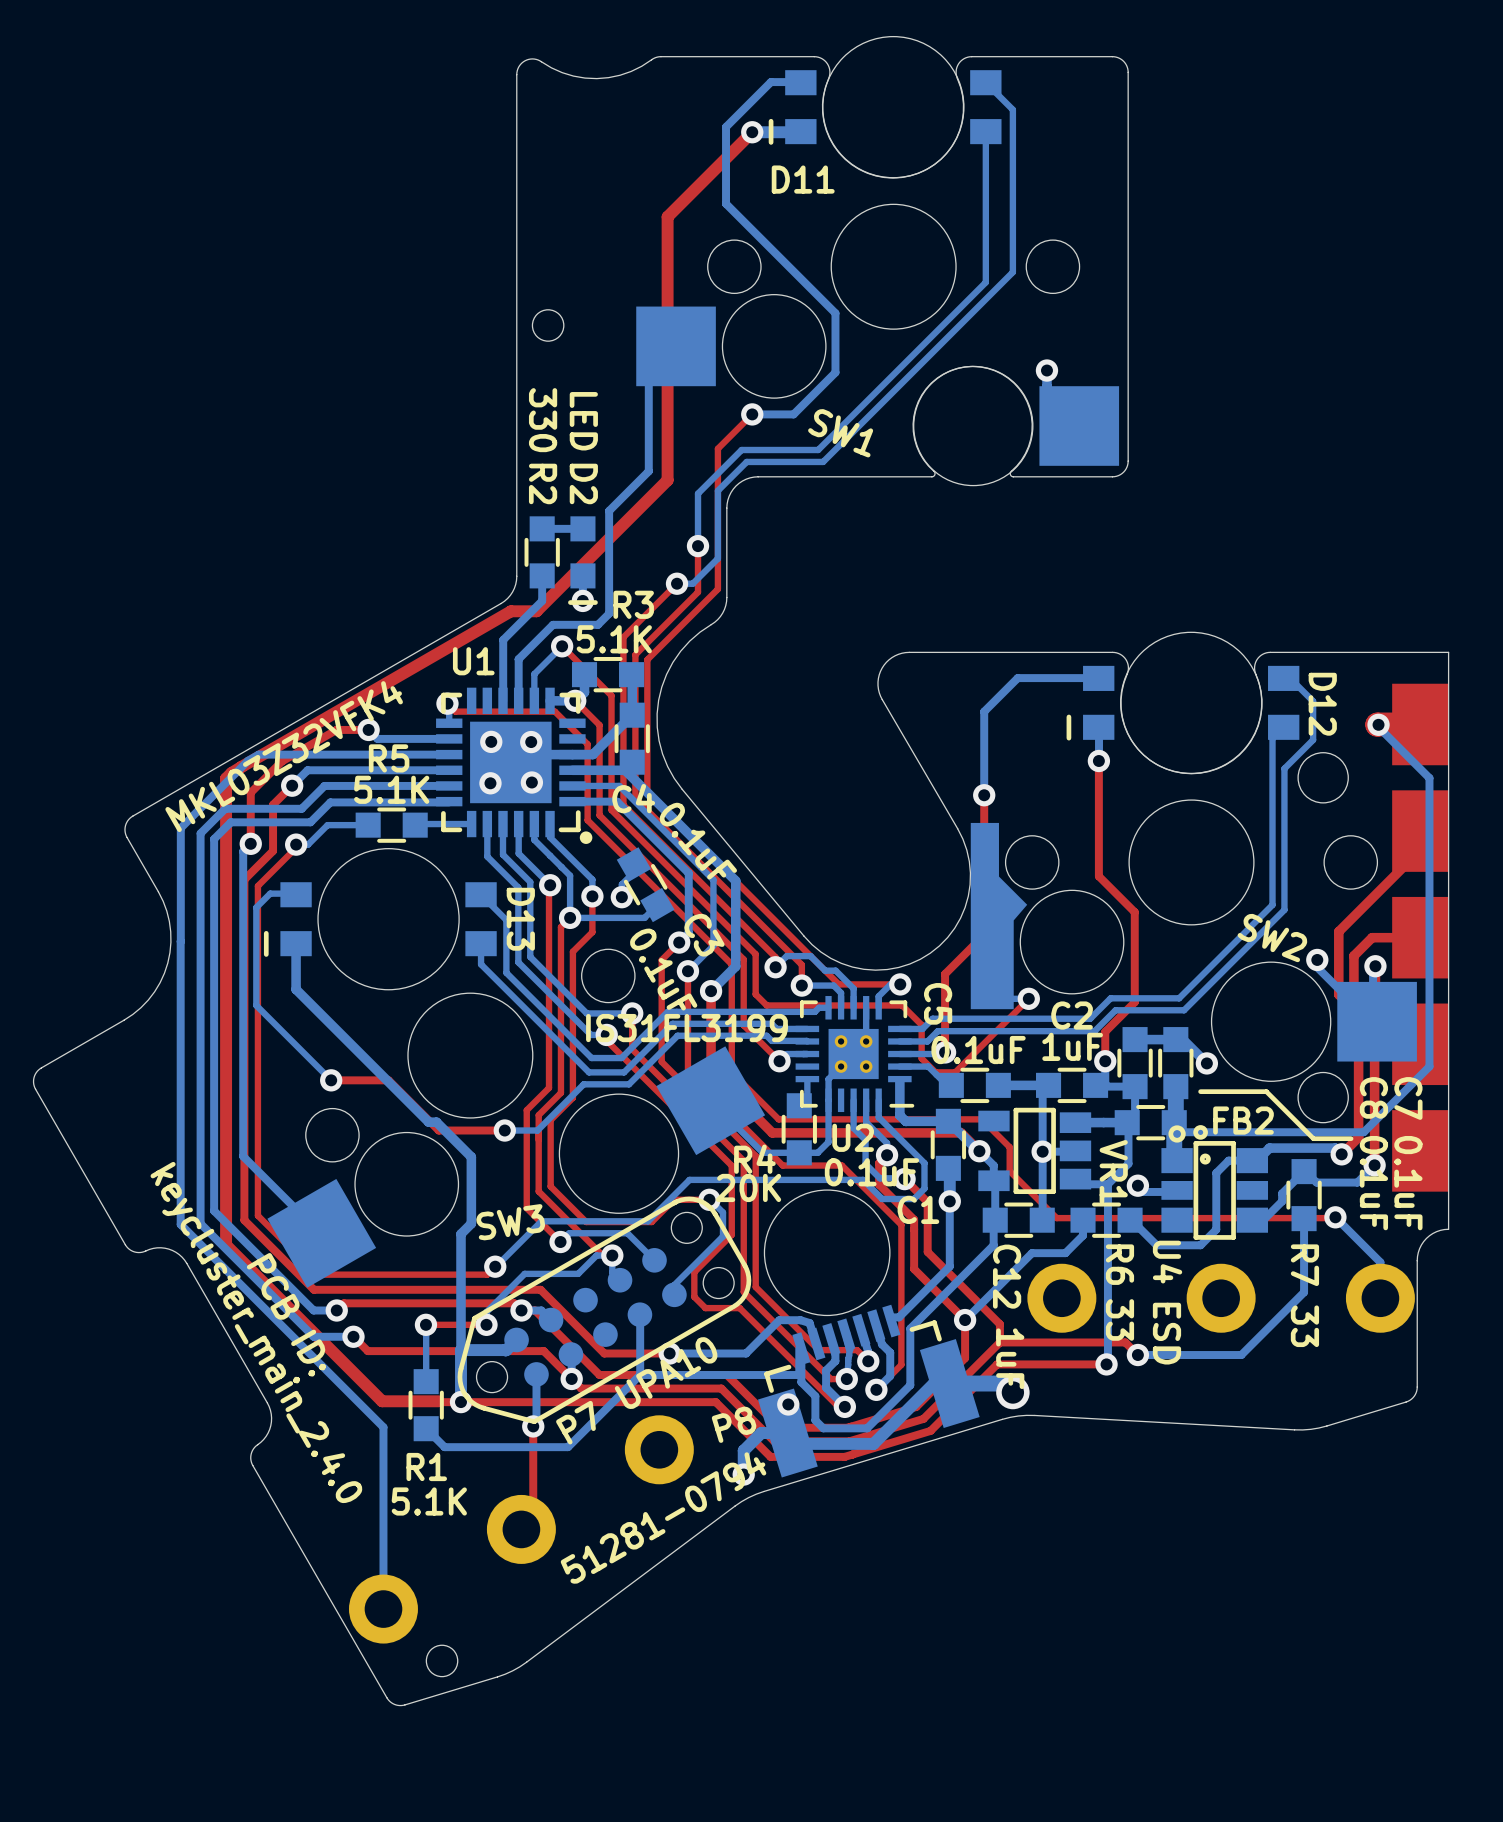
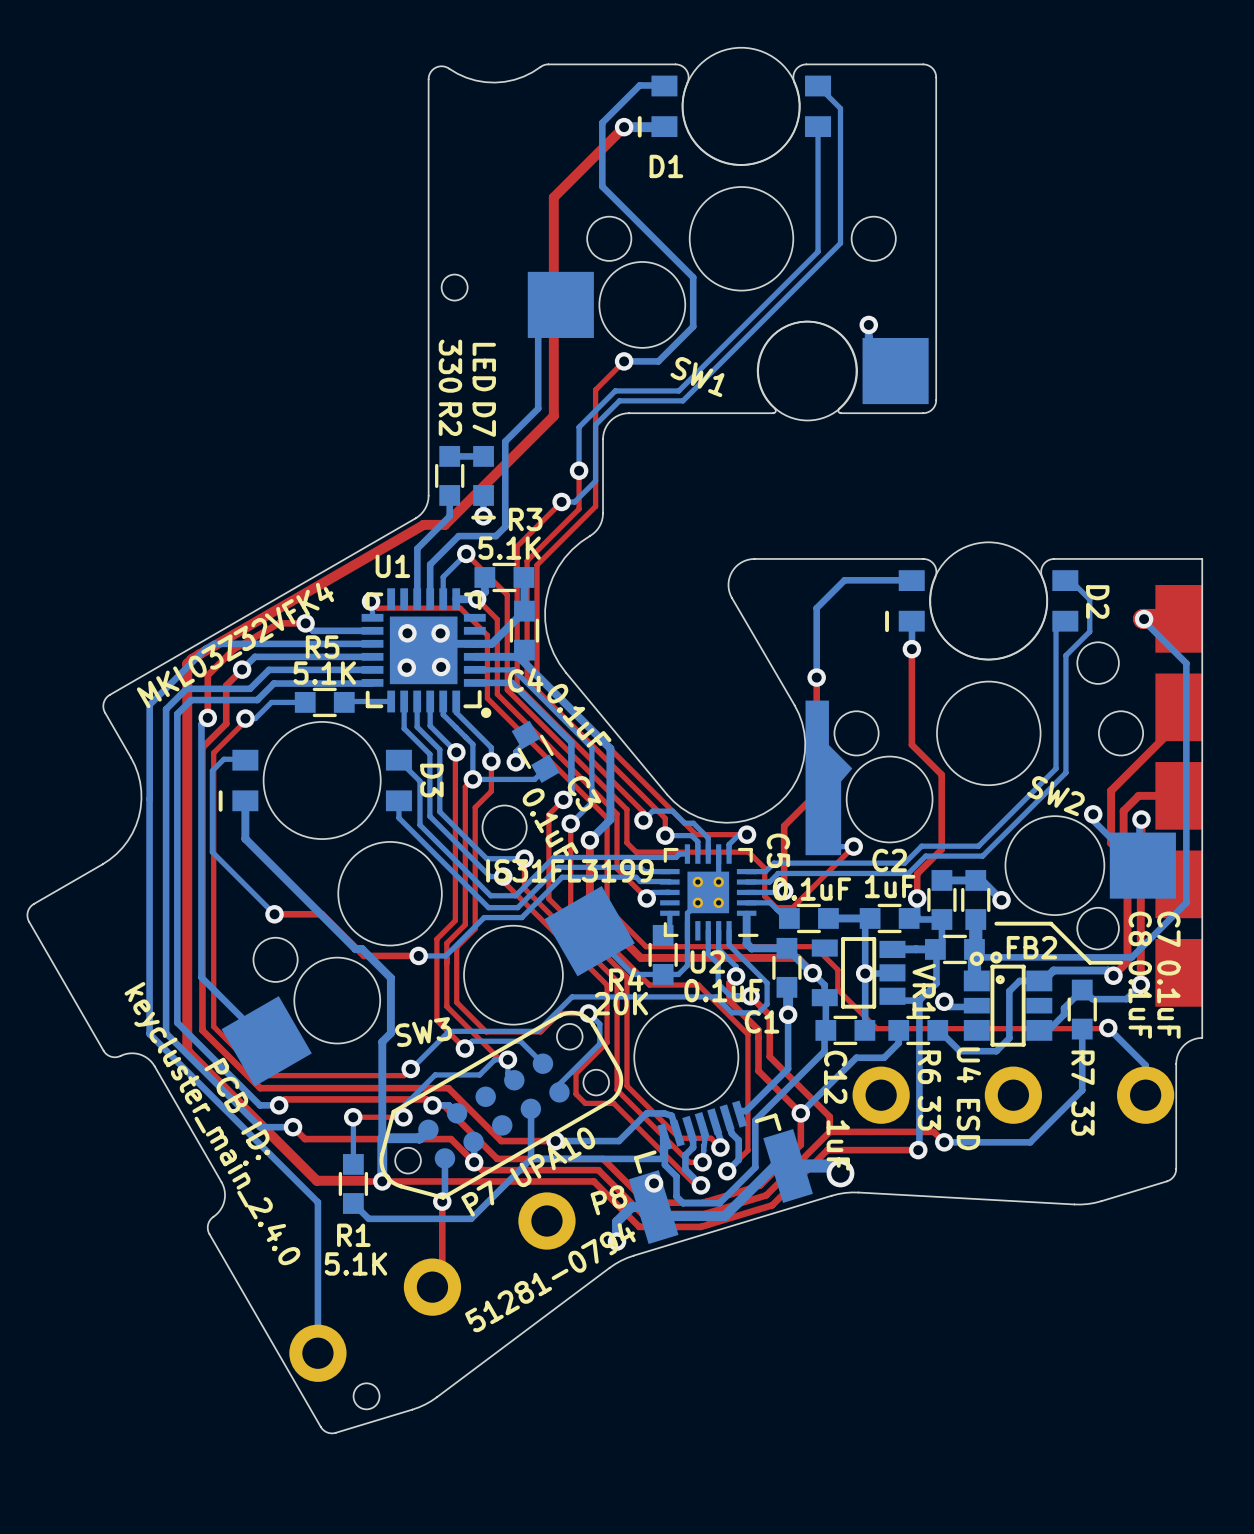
D11 name: D11 (803, 179) -> D1 (666, 166)
D2 name: D2 (583, 483) -> D7 (484, 419)
D12 name: D12 (1322, 704) -> D2 (1097, 602)
D13 name: D13 (520, 919) -> D3 (431, 780)

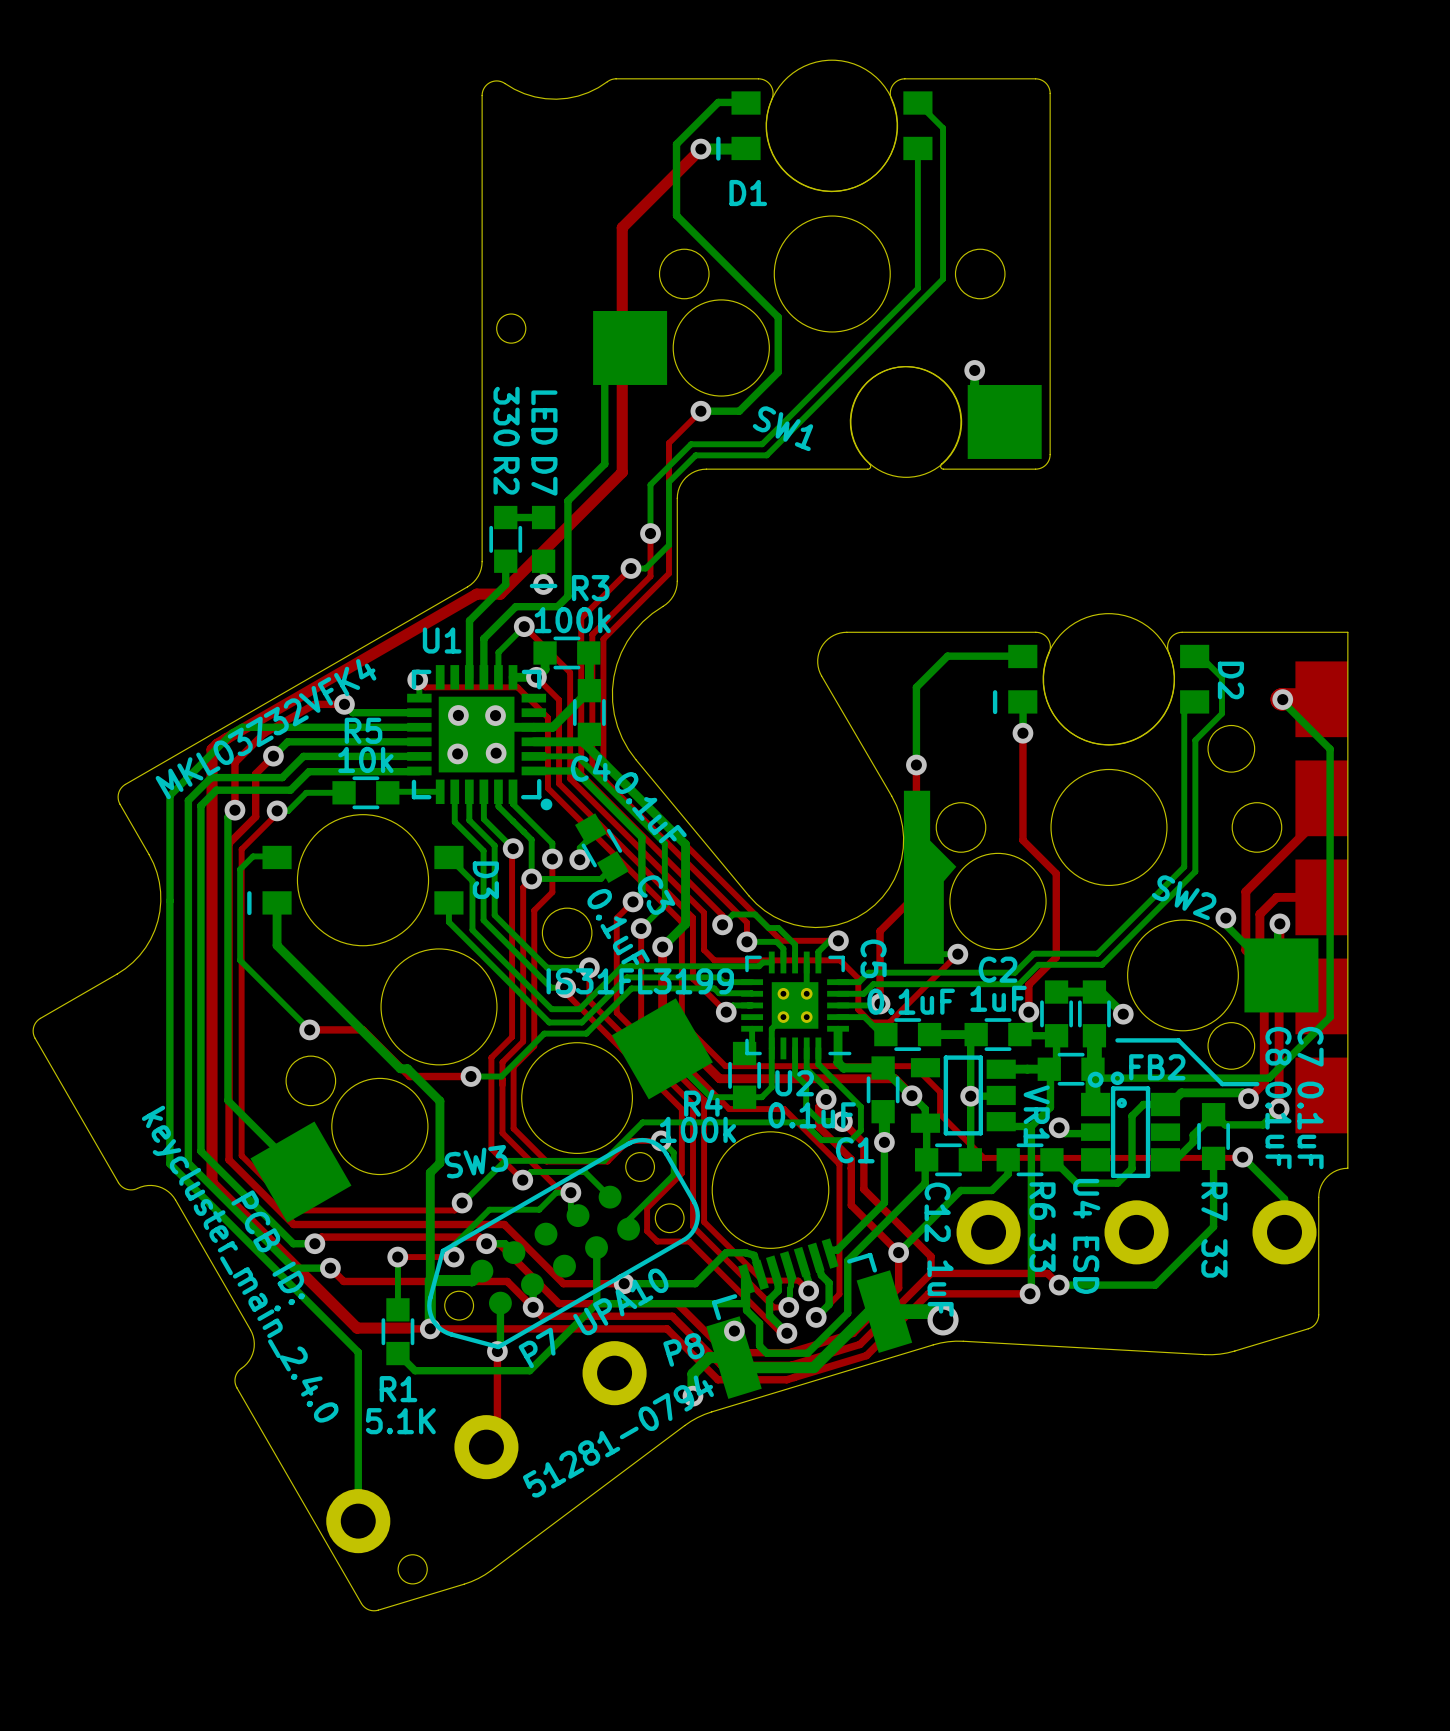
R3 value: 5.1K (509, 548) -> 100k (572, 620)
R5 value: 5.1K (324, 673) -> 10k (365, 759)
R4 value: 20K (621, 1003) -> 100k (697, 1129)

